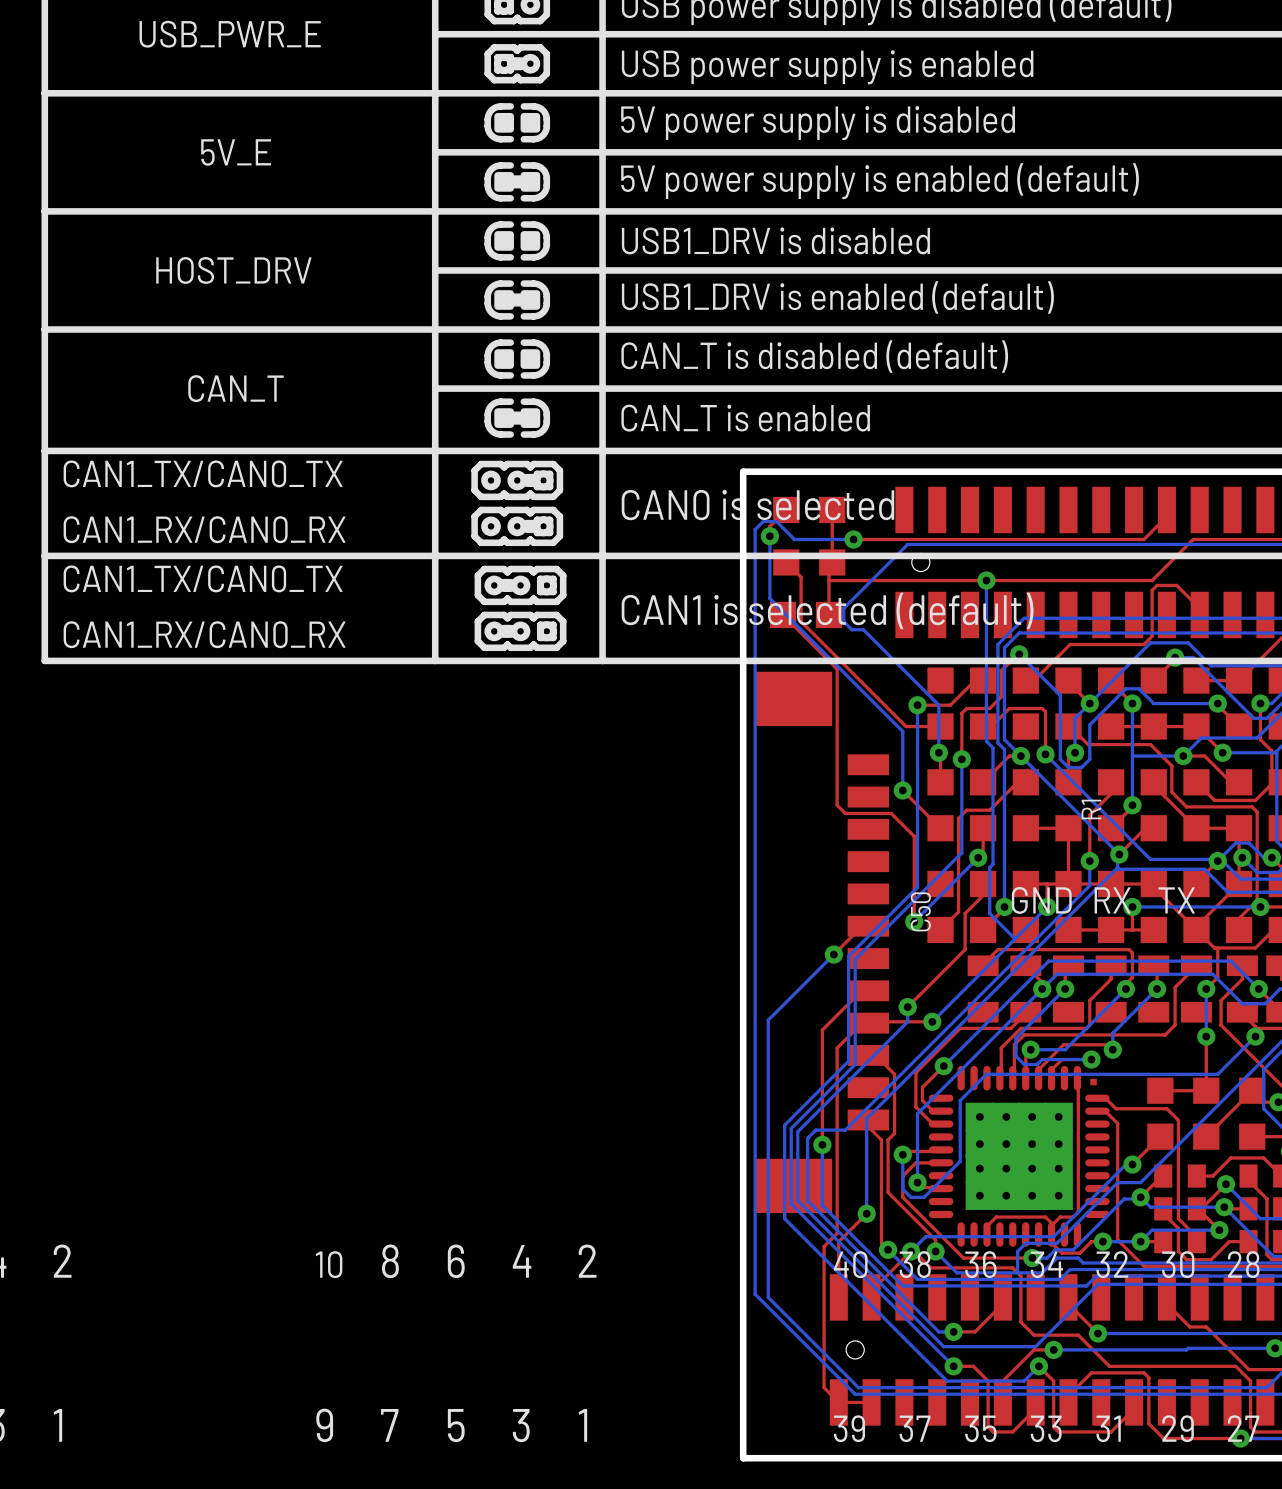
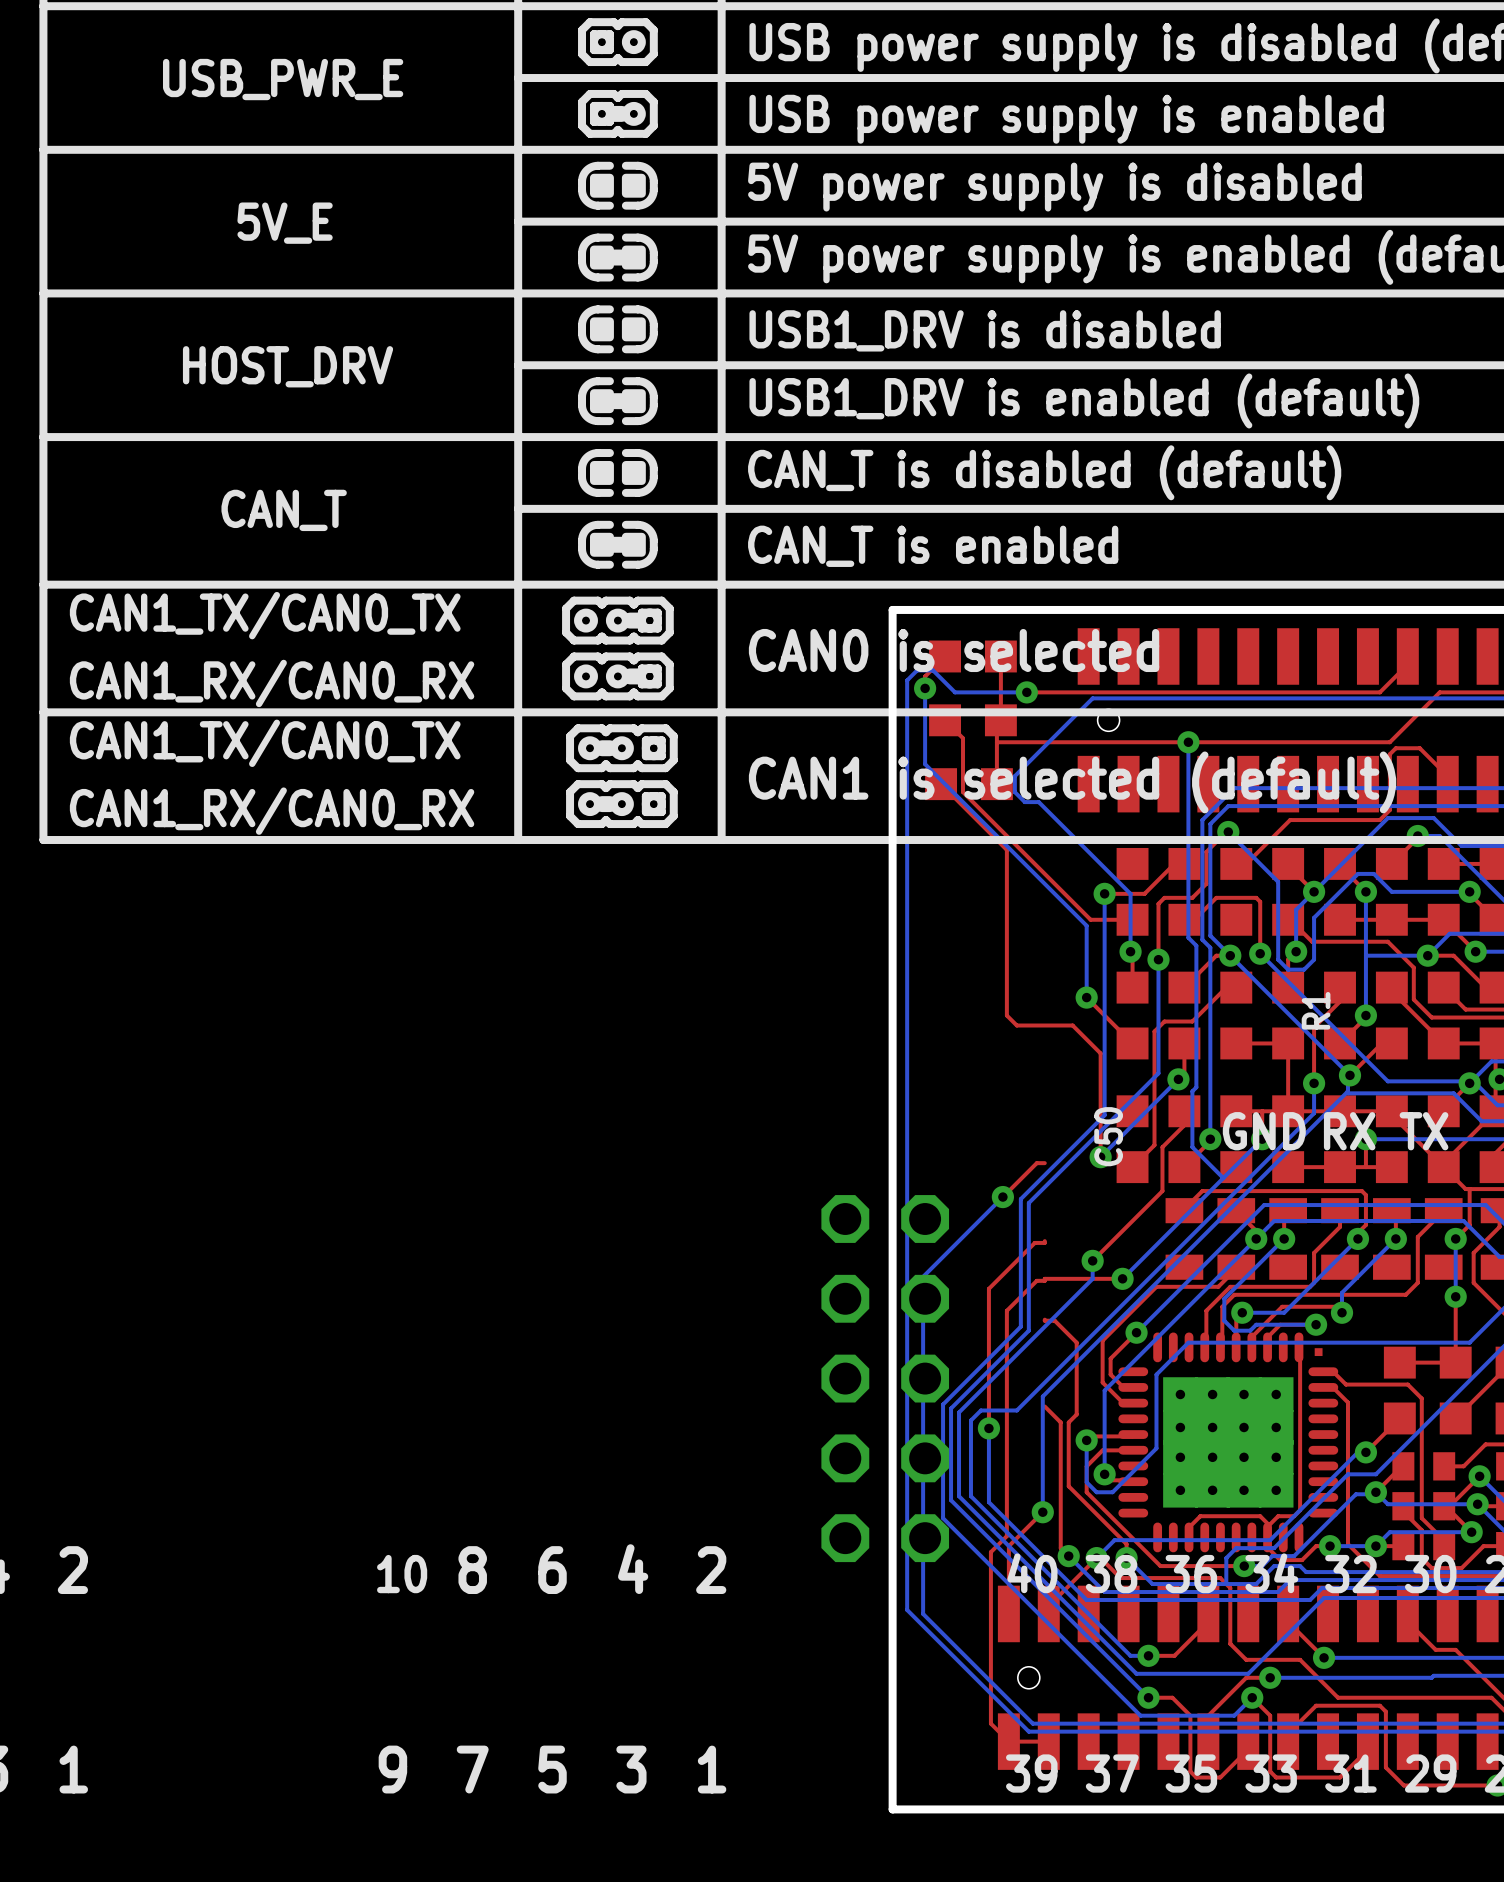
part: (821, 942) -> none
part: none -> (885, 1378)

